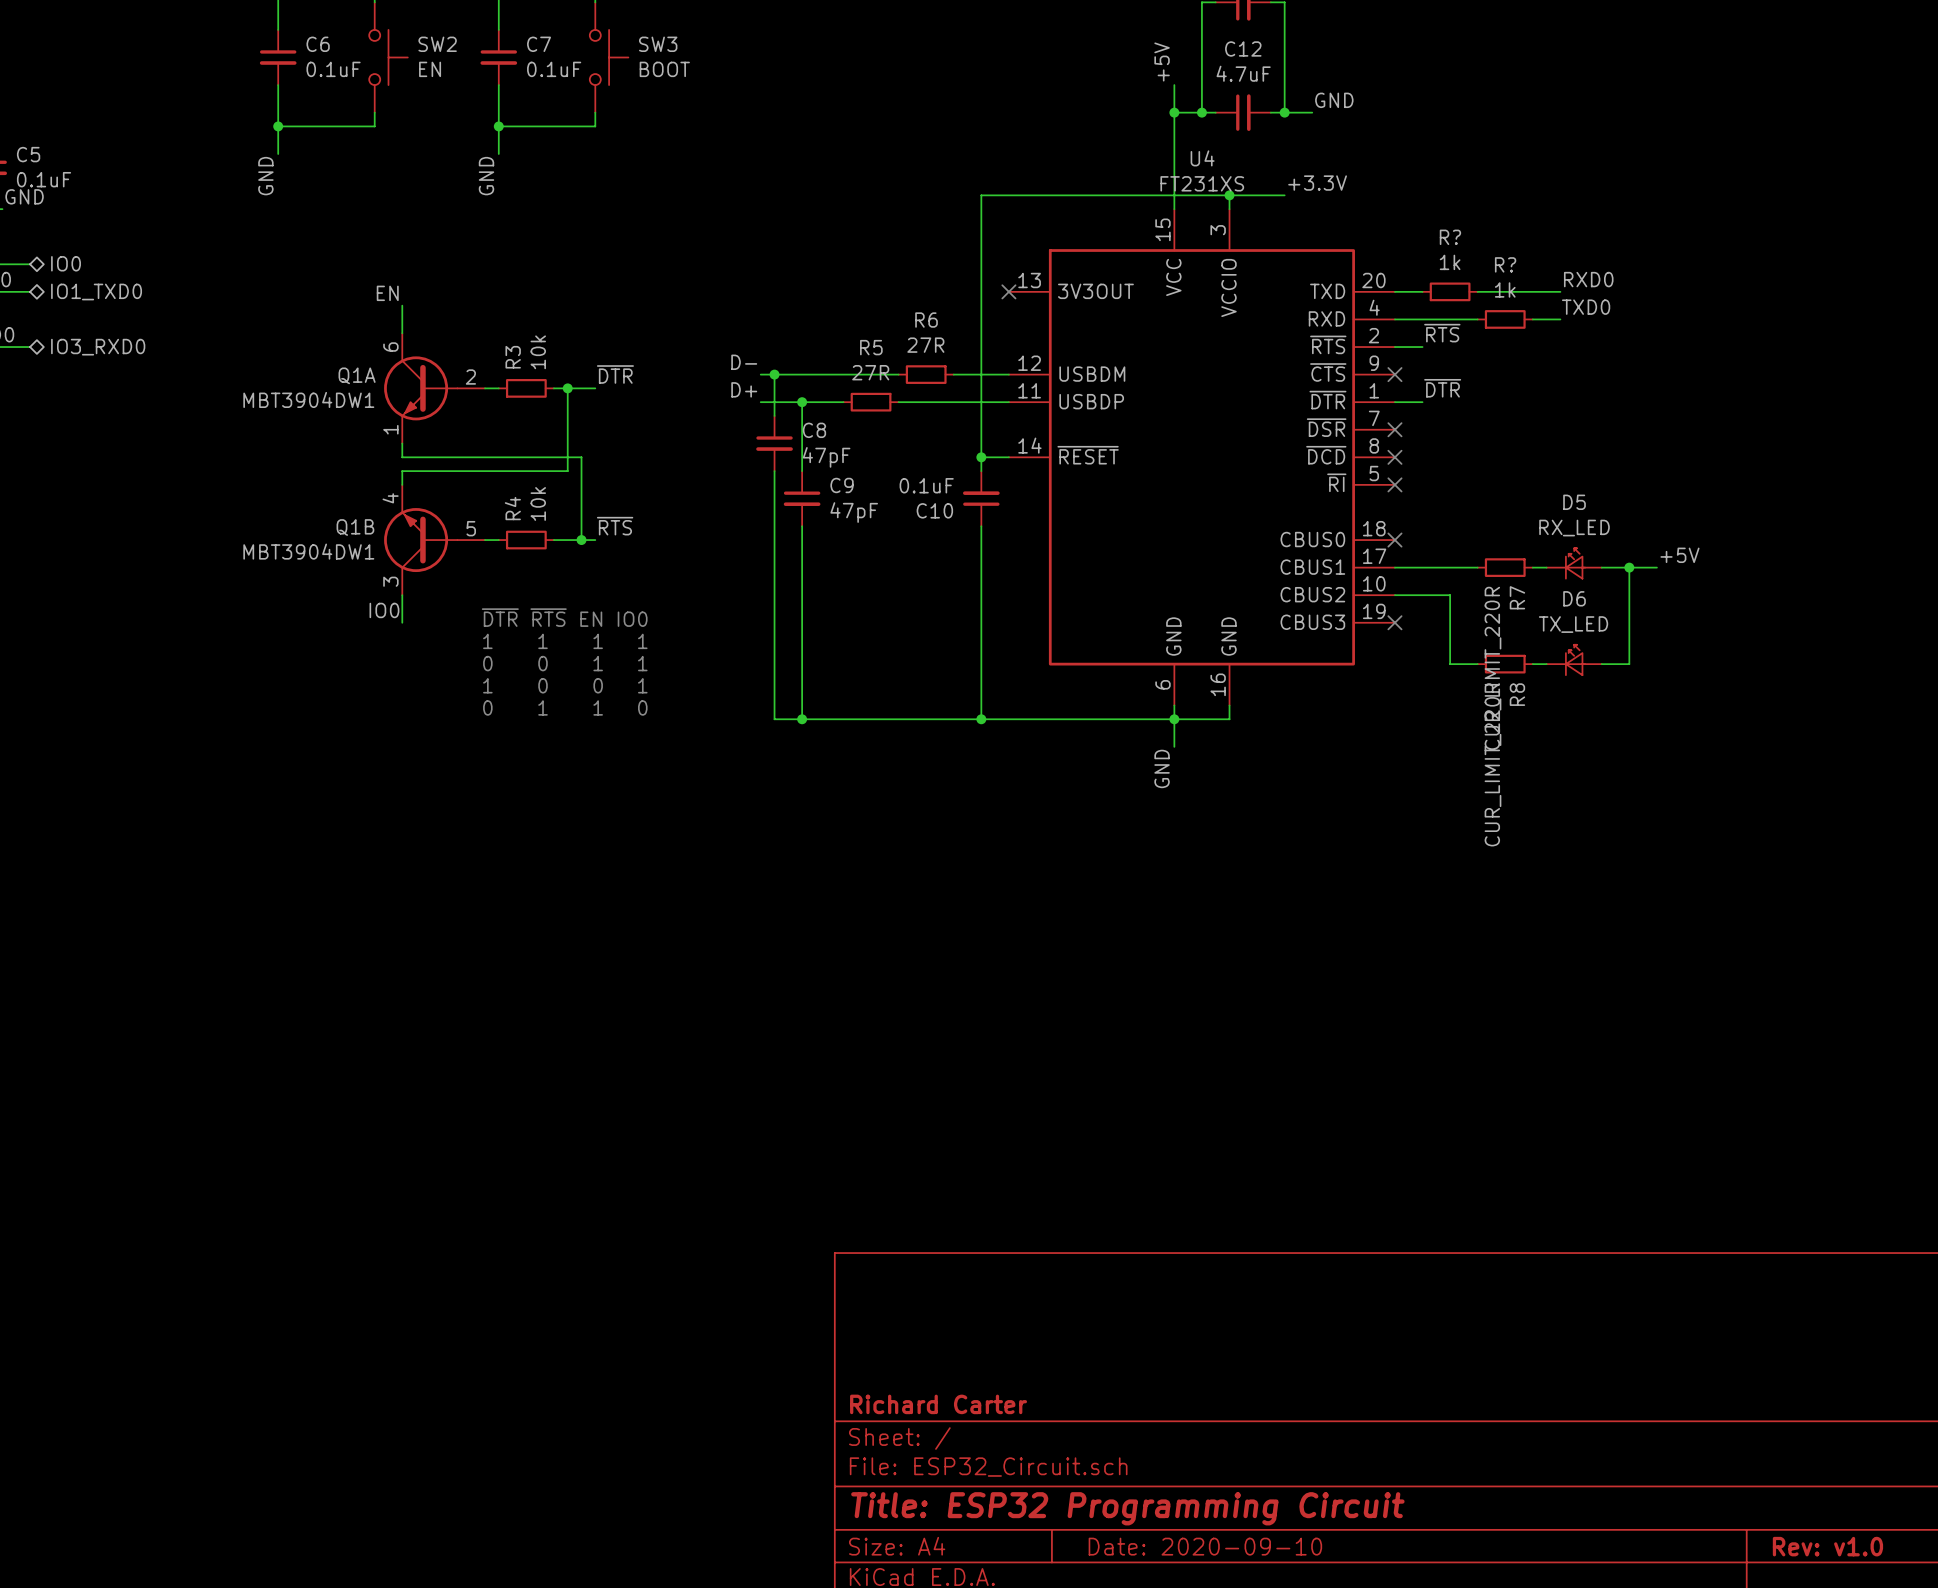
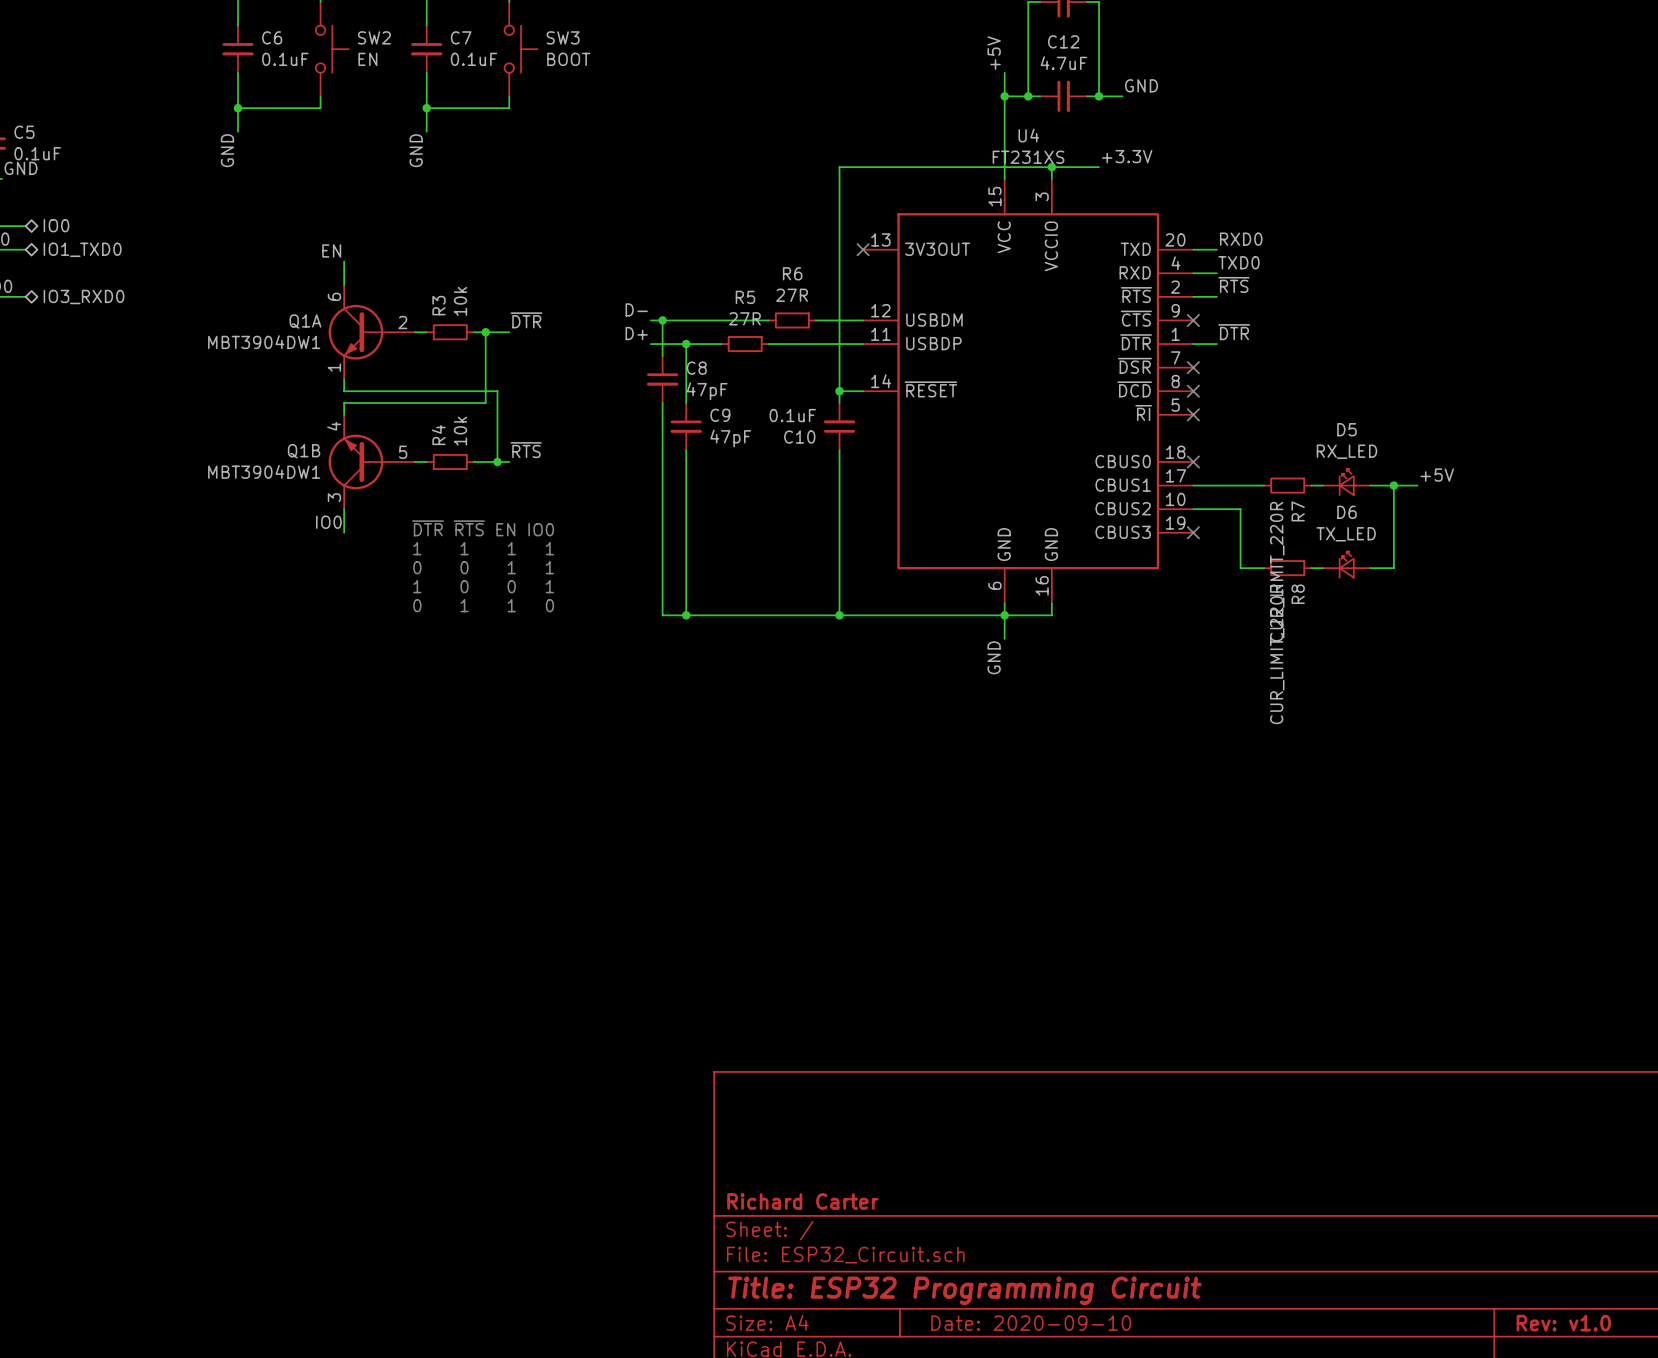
label position: RXD0 (1588, 279) -> RXD0 (1241, 239)
R?: 1k (1450, 291) -> none
wire: (1477, 291) (1560, 291) -> none
label position: TXD0 (1586, 307) -> TXD0 (1238, 262)
wire: (1422, 319) (1477, 319) -> none
R?: 1k (1505, 319) -> none
wire: (1532, 319) (1560, 319) -> none

